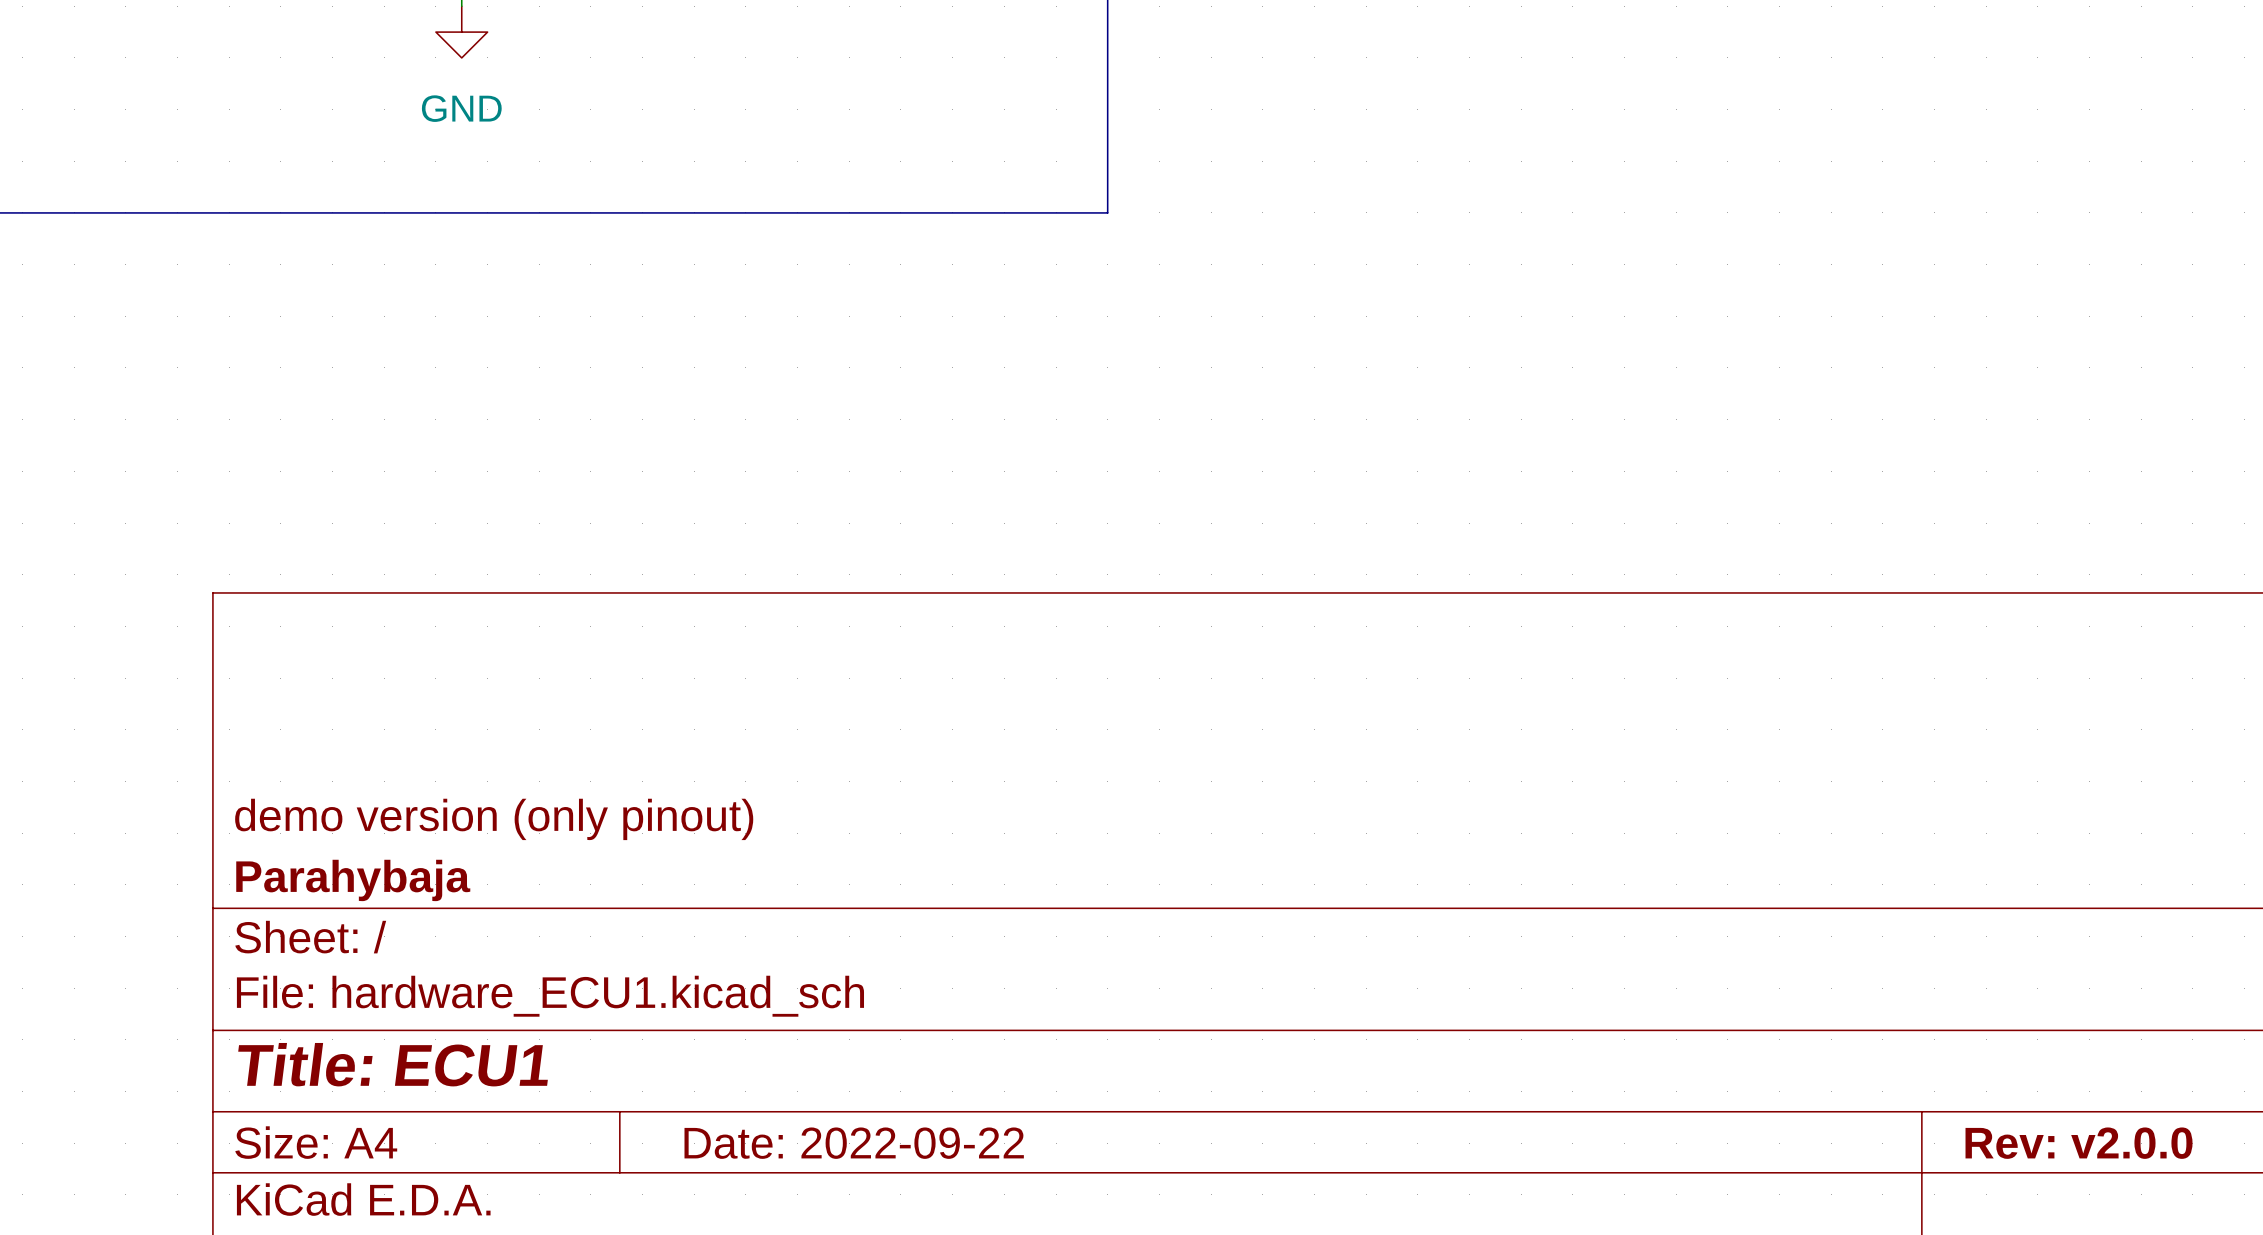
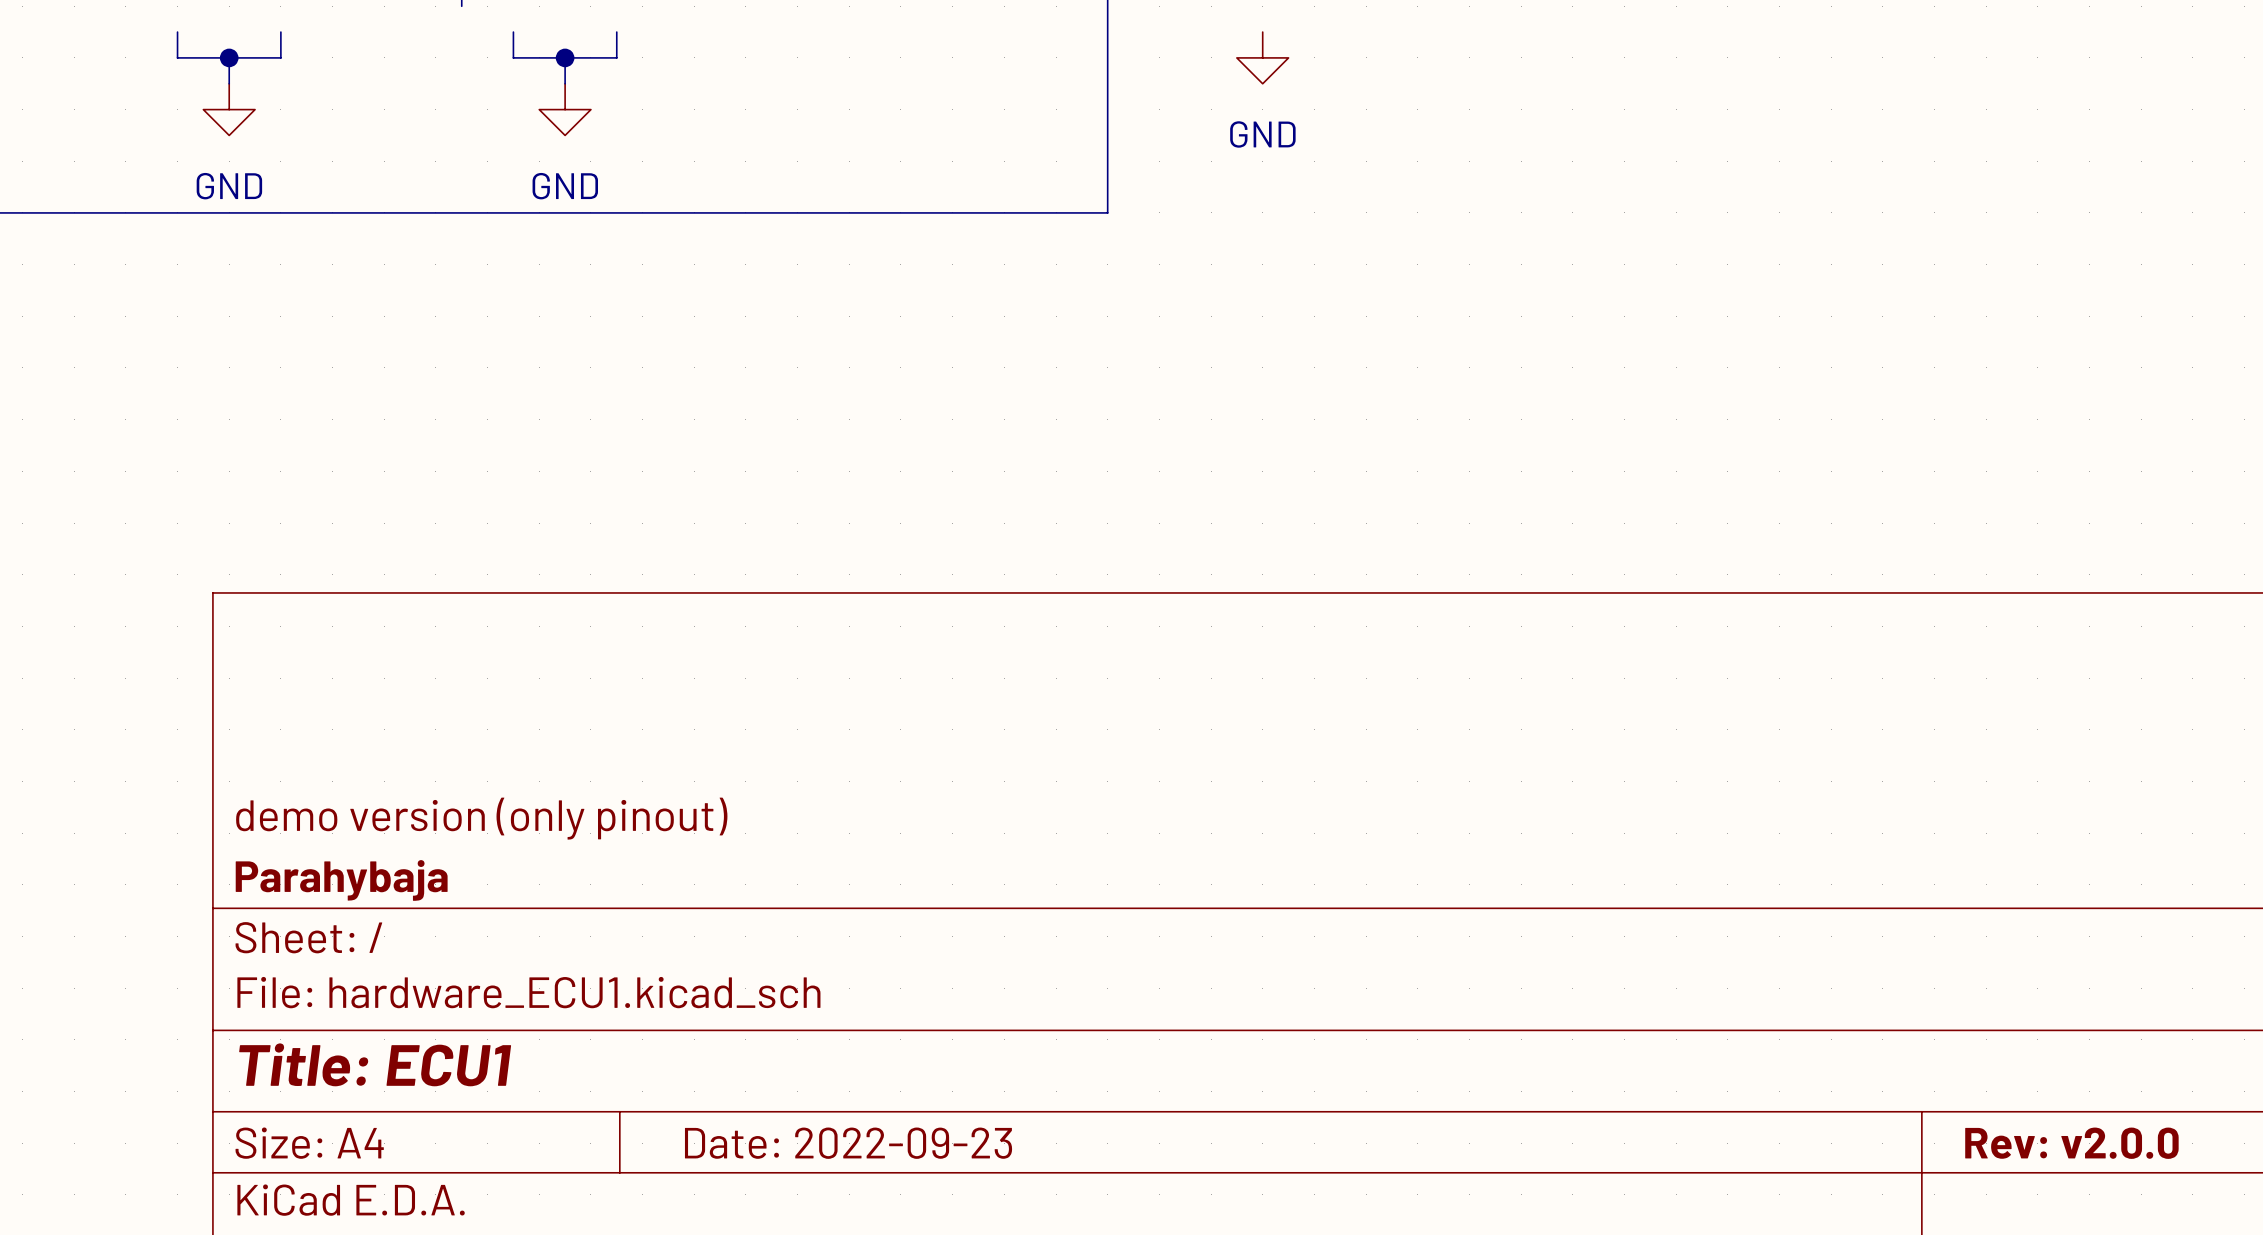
wire: none -> (177, 32) (177, 57) (280, 57) (280, 32)
power symbol: GND (461, 32) -> none
wire: none -> (513, 32) (513, 57) (616, 57) (616, 32)
wire: none -> (229, 57) (229, 83)
junction: none -> (229, 57)
wire: none -> (565, 57) (565, 83)
junction: none -> (565, 57)
power symbol: none -> GND (1262, 57)
power symbol: none -> GND (229, 109)
power symbol: none -> GND (565, 109)
title block: Date: 2022-09-22 (854, 1143) -> Date: 2022-09-23 (848, 1143)

